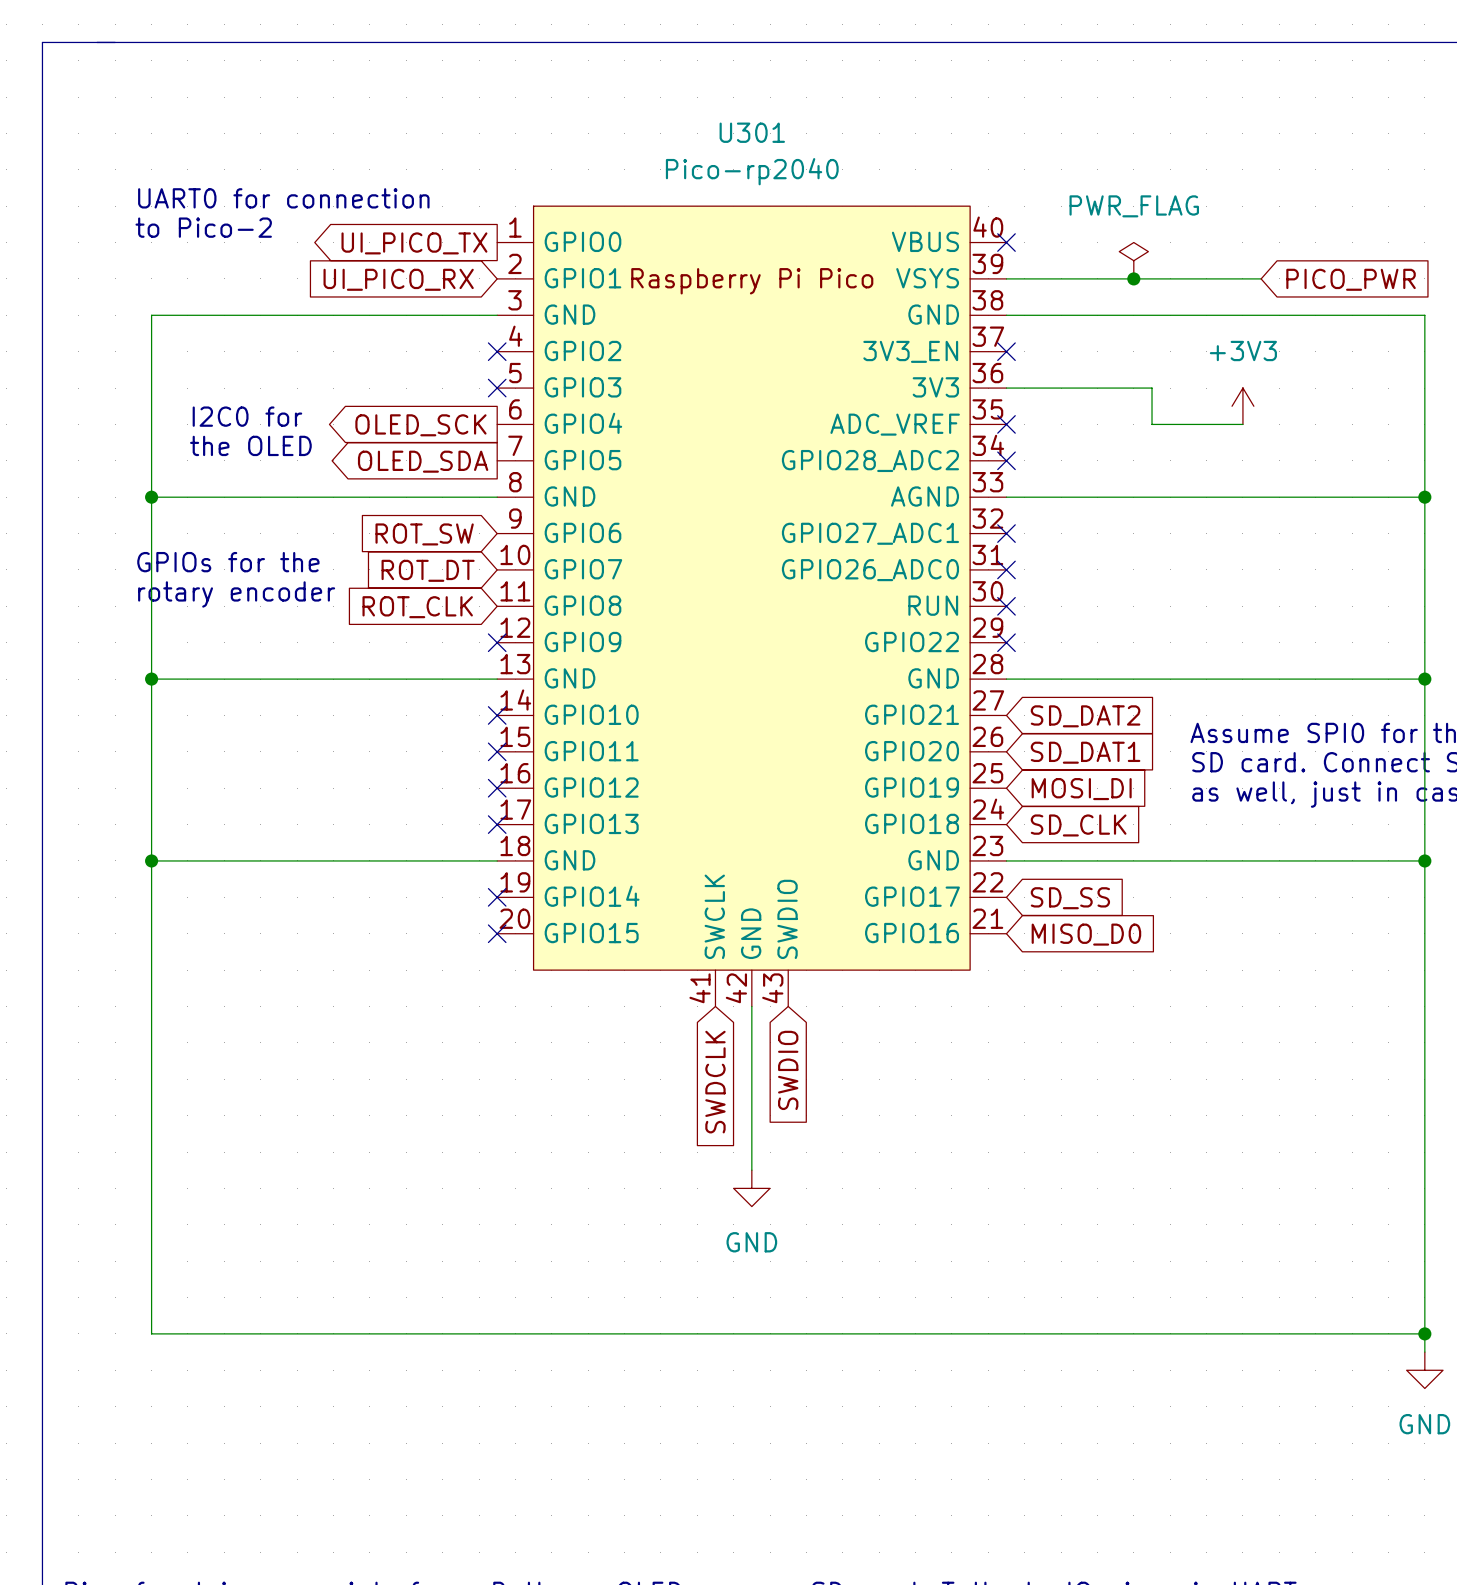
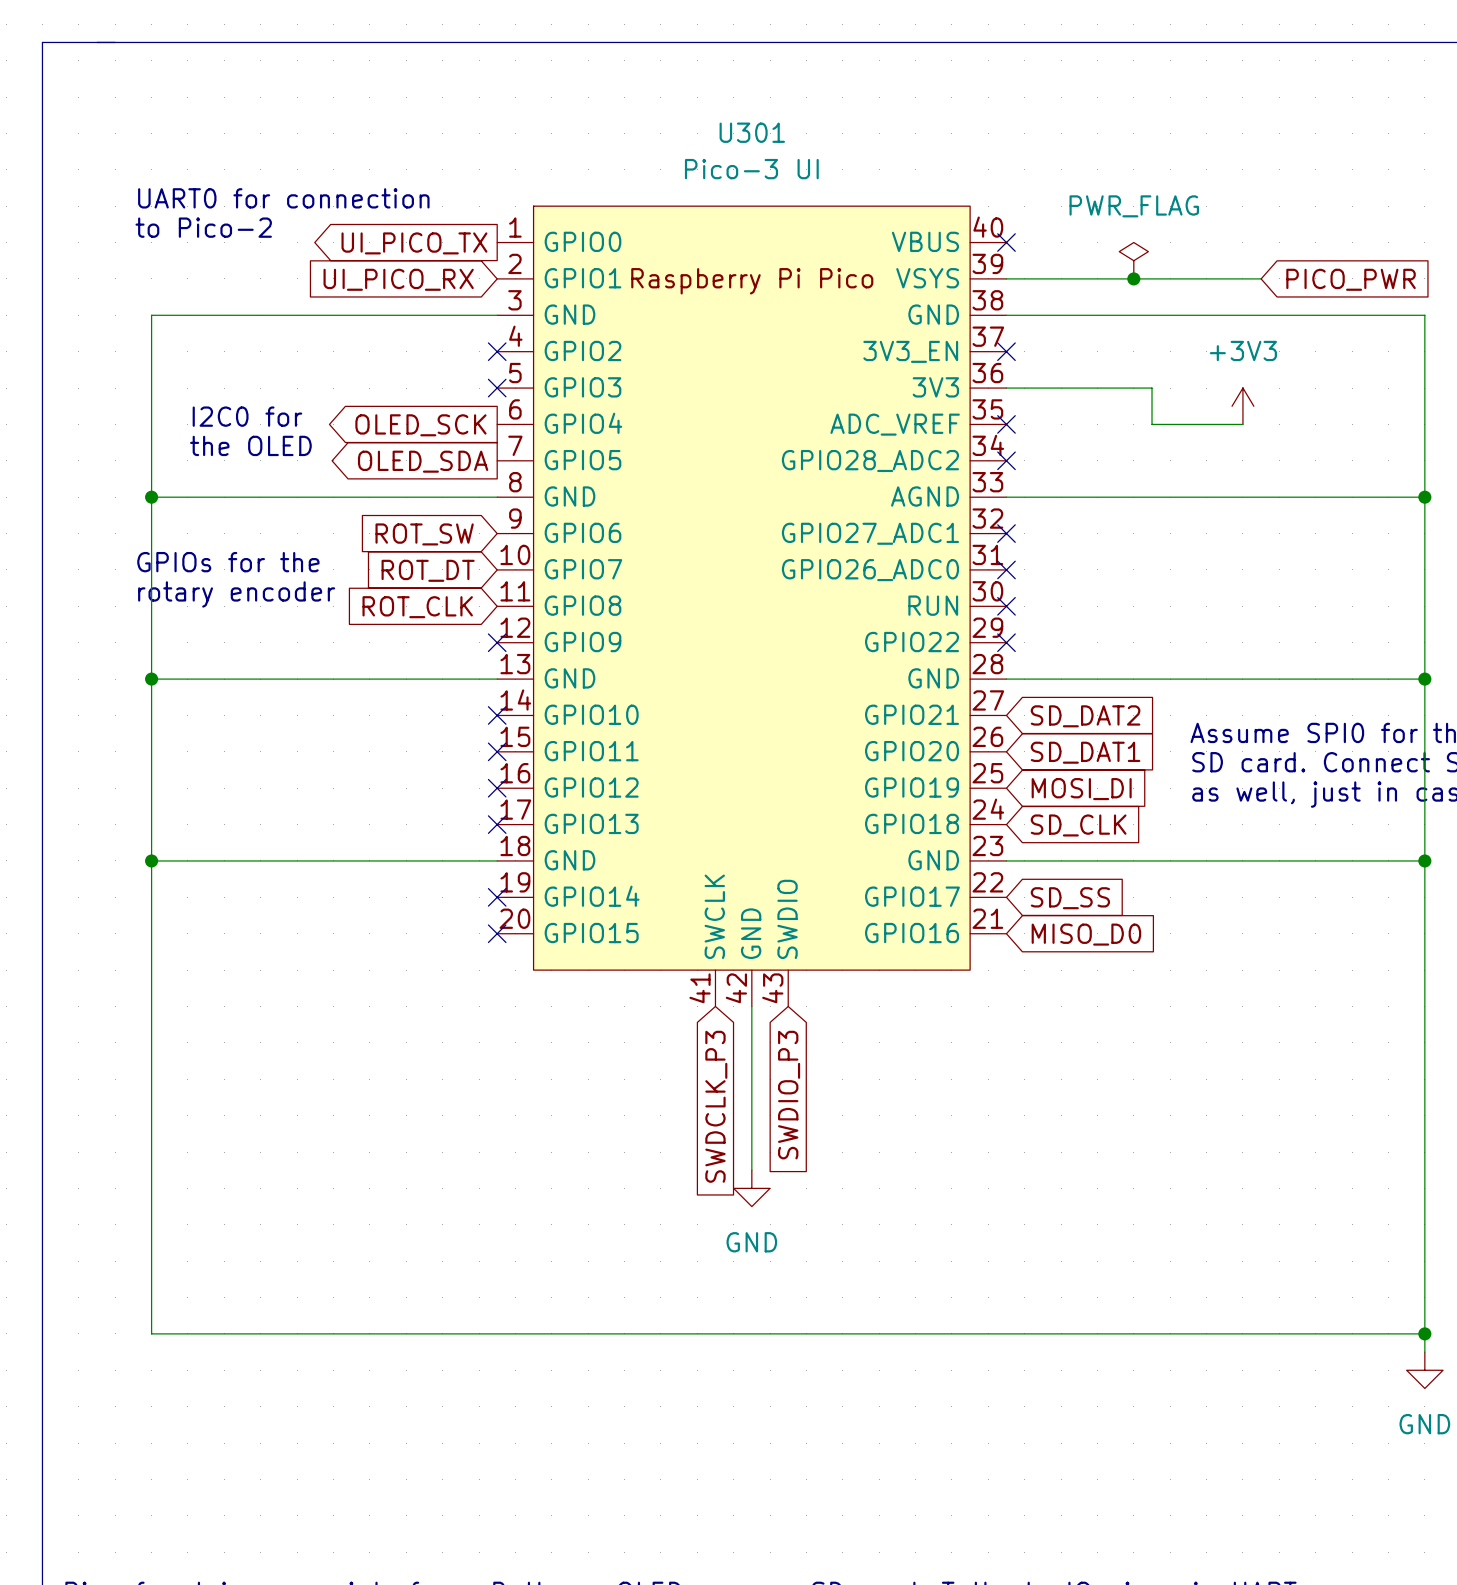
U301 value: Pico-rp2040 (752, 171) -> Pico-3 UI (751, 169)
global label: SWDIO (788, 1070) -> SWDIO_P3 (789, 1095)
global label: SWDCLK (715, 1082) -> SWDCLK_P3 (716, 1106)

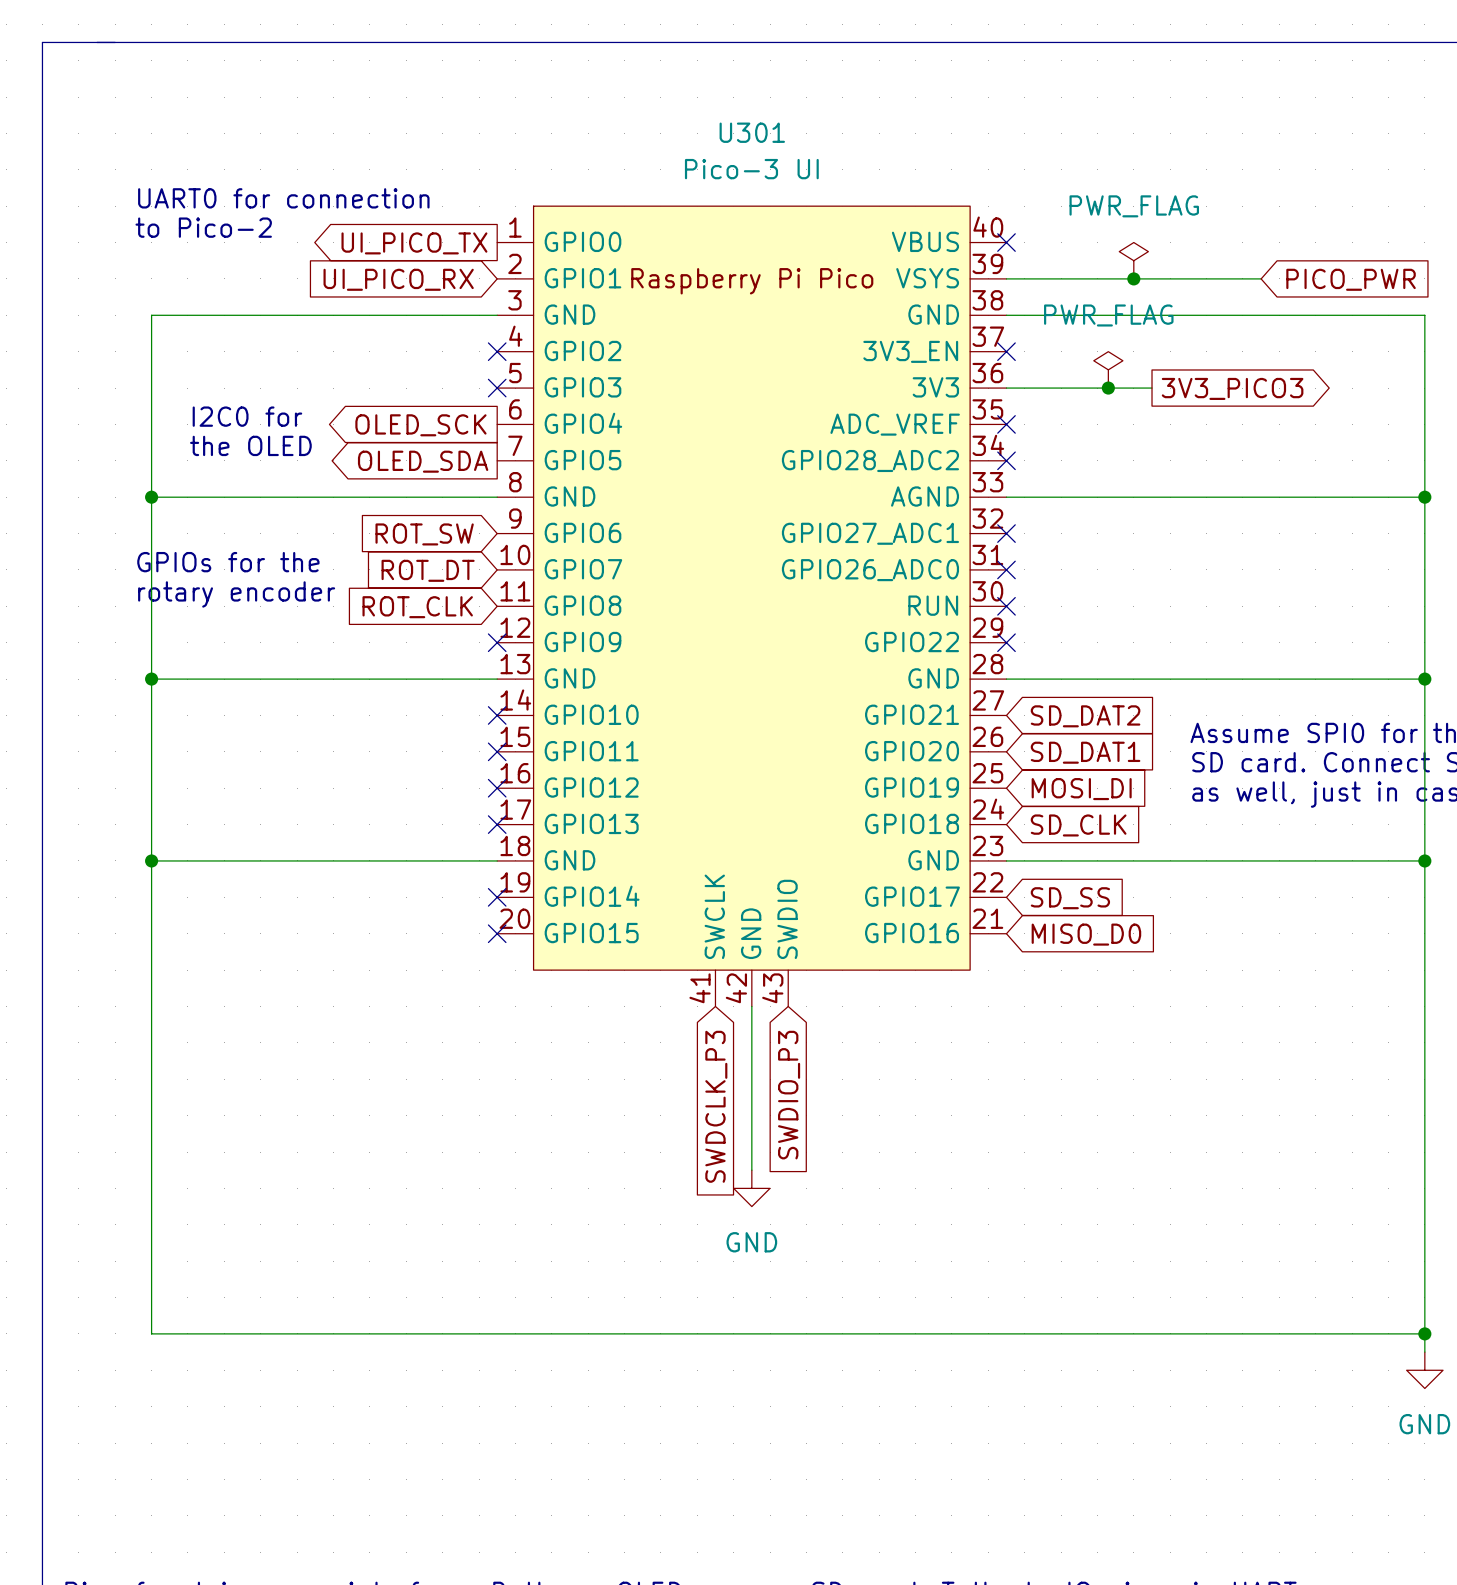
power symbol: none -> PWR_FLAG (1108, 369)
junction: none -> (1108, 388)
wire: (1152, 388) (1152, 424) (1242, 424) -> none
global label: none -> 3V3_PICO3 (1232, 388)
power symbol: +3V3 (1242, 406) -> none

